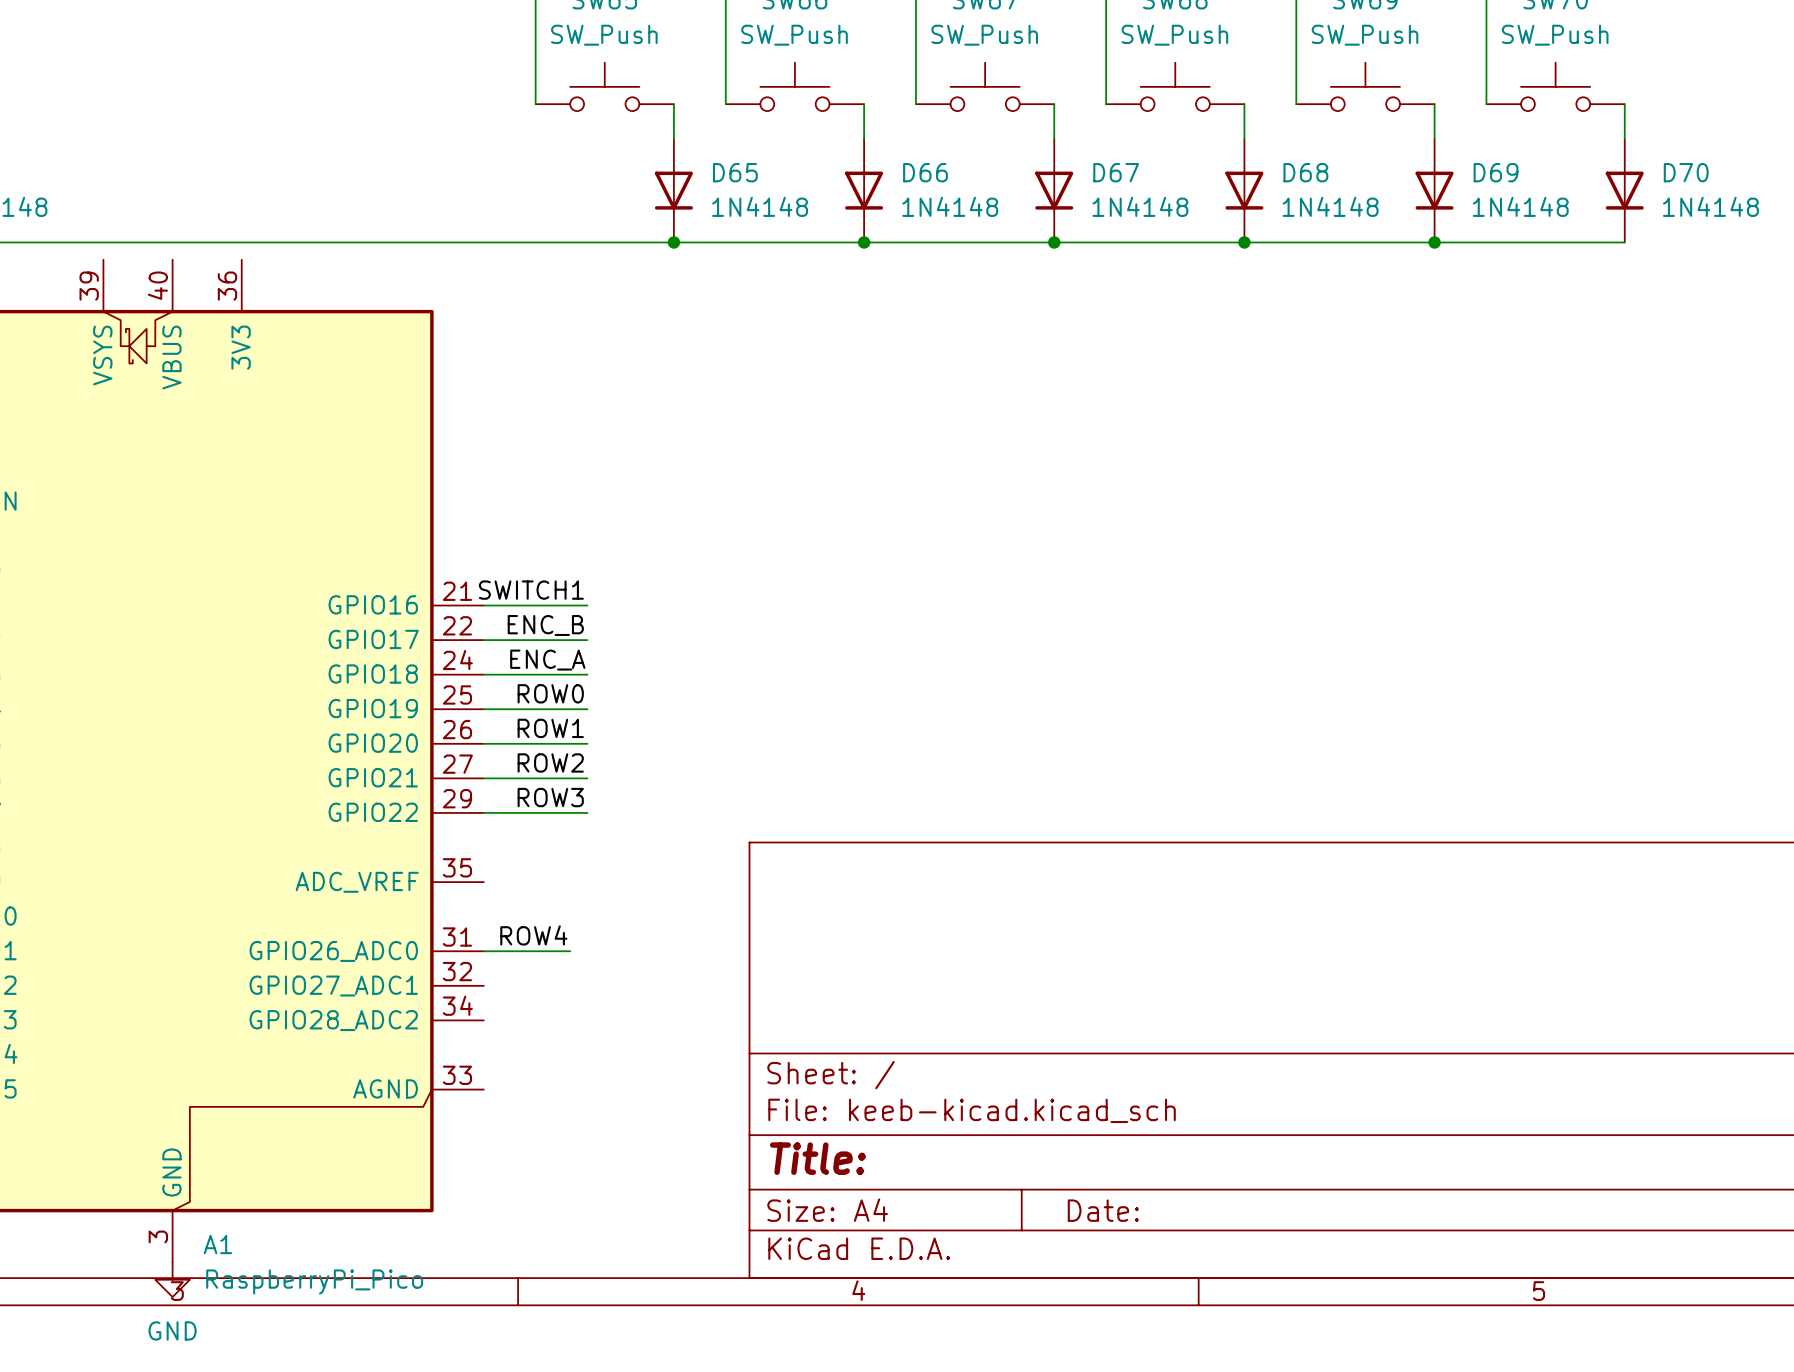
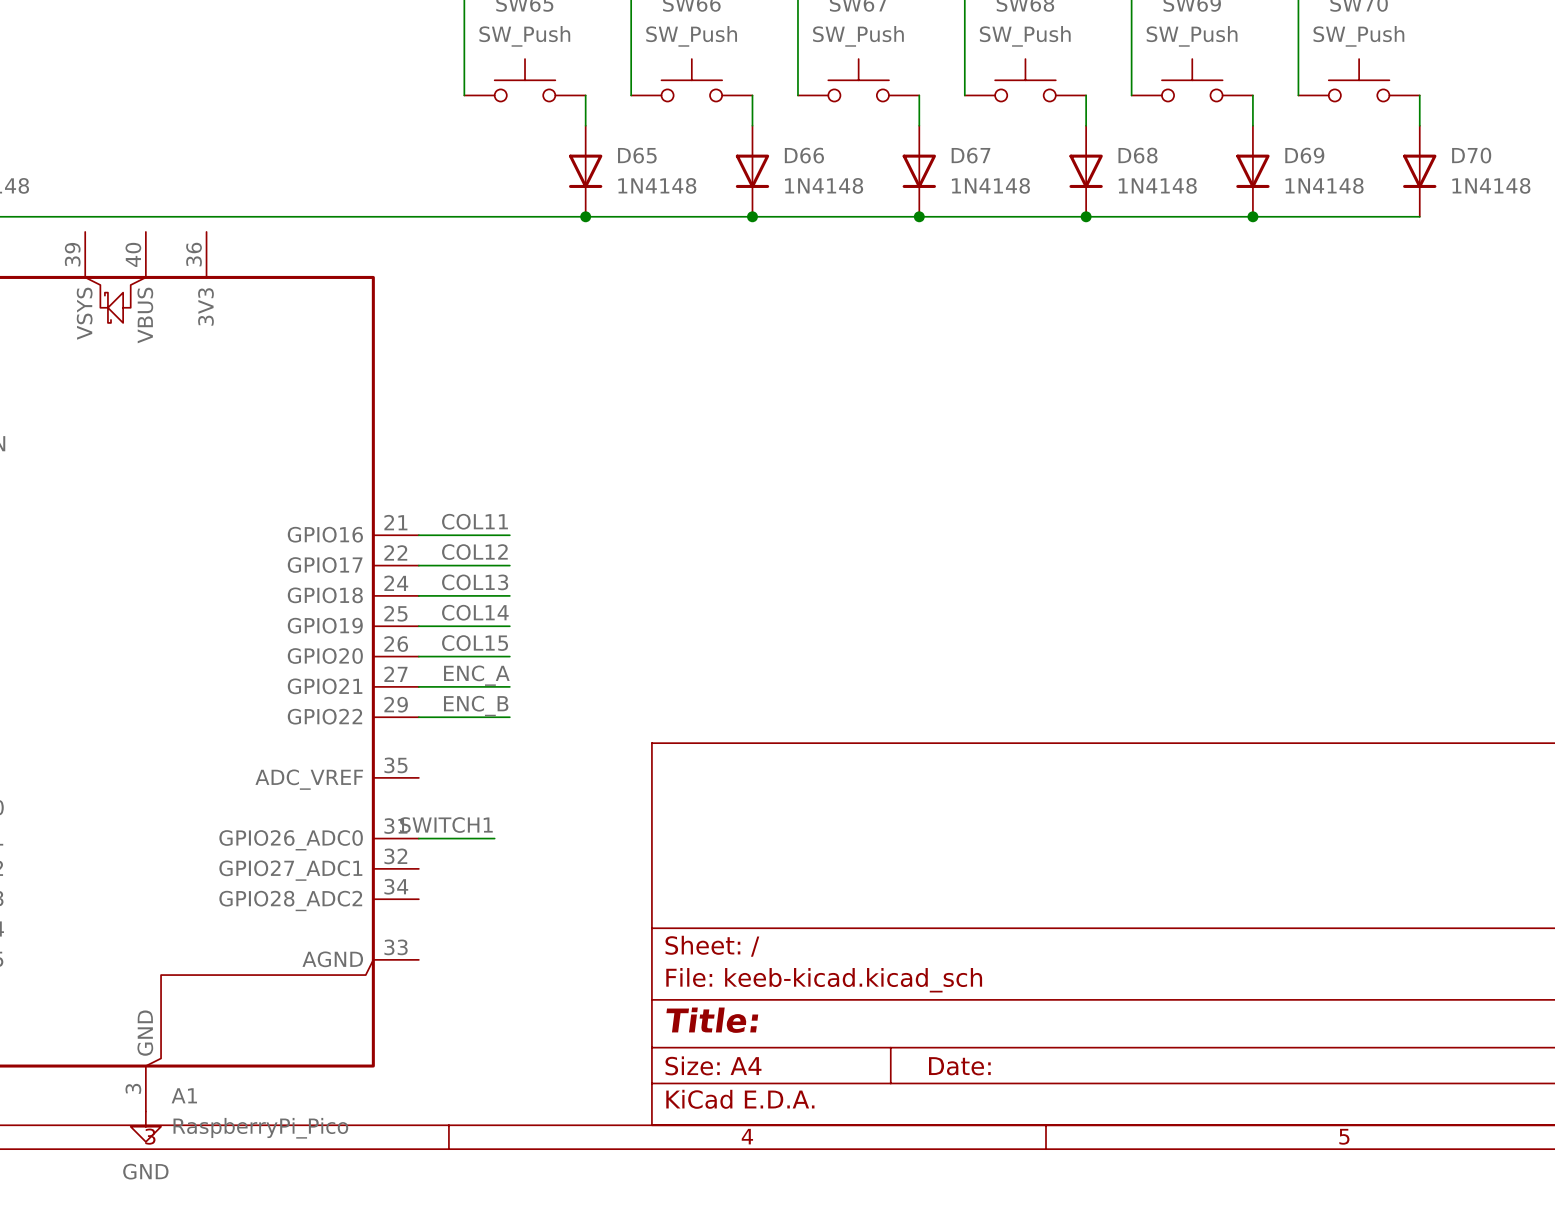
label: SWITCH1 (531, 590) -> COL11 (474, 521)
label: ENC_B (545, 625) -> COL12 (474, 552)
label: ENC_A (547, 660) -> COL13 (475, 582)
label: ROW0 (550, 693) -> COL14 (475, 612)
label: ROW1 (550, 728) -> COL15 (475, 643)
label: ROW2 (550, 762) -> ENC_A (476, 675)
label: ROW3 (550, 797) -> ENC_B (476, 706)
label: ROW4 (533, 935) -> SWITCH1 (446, 825)

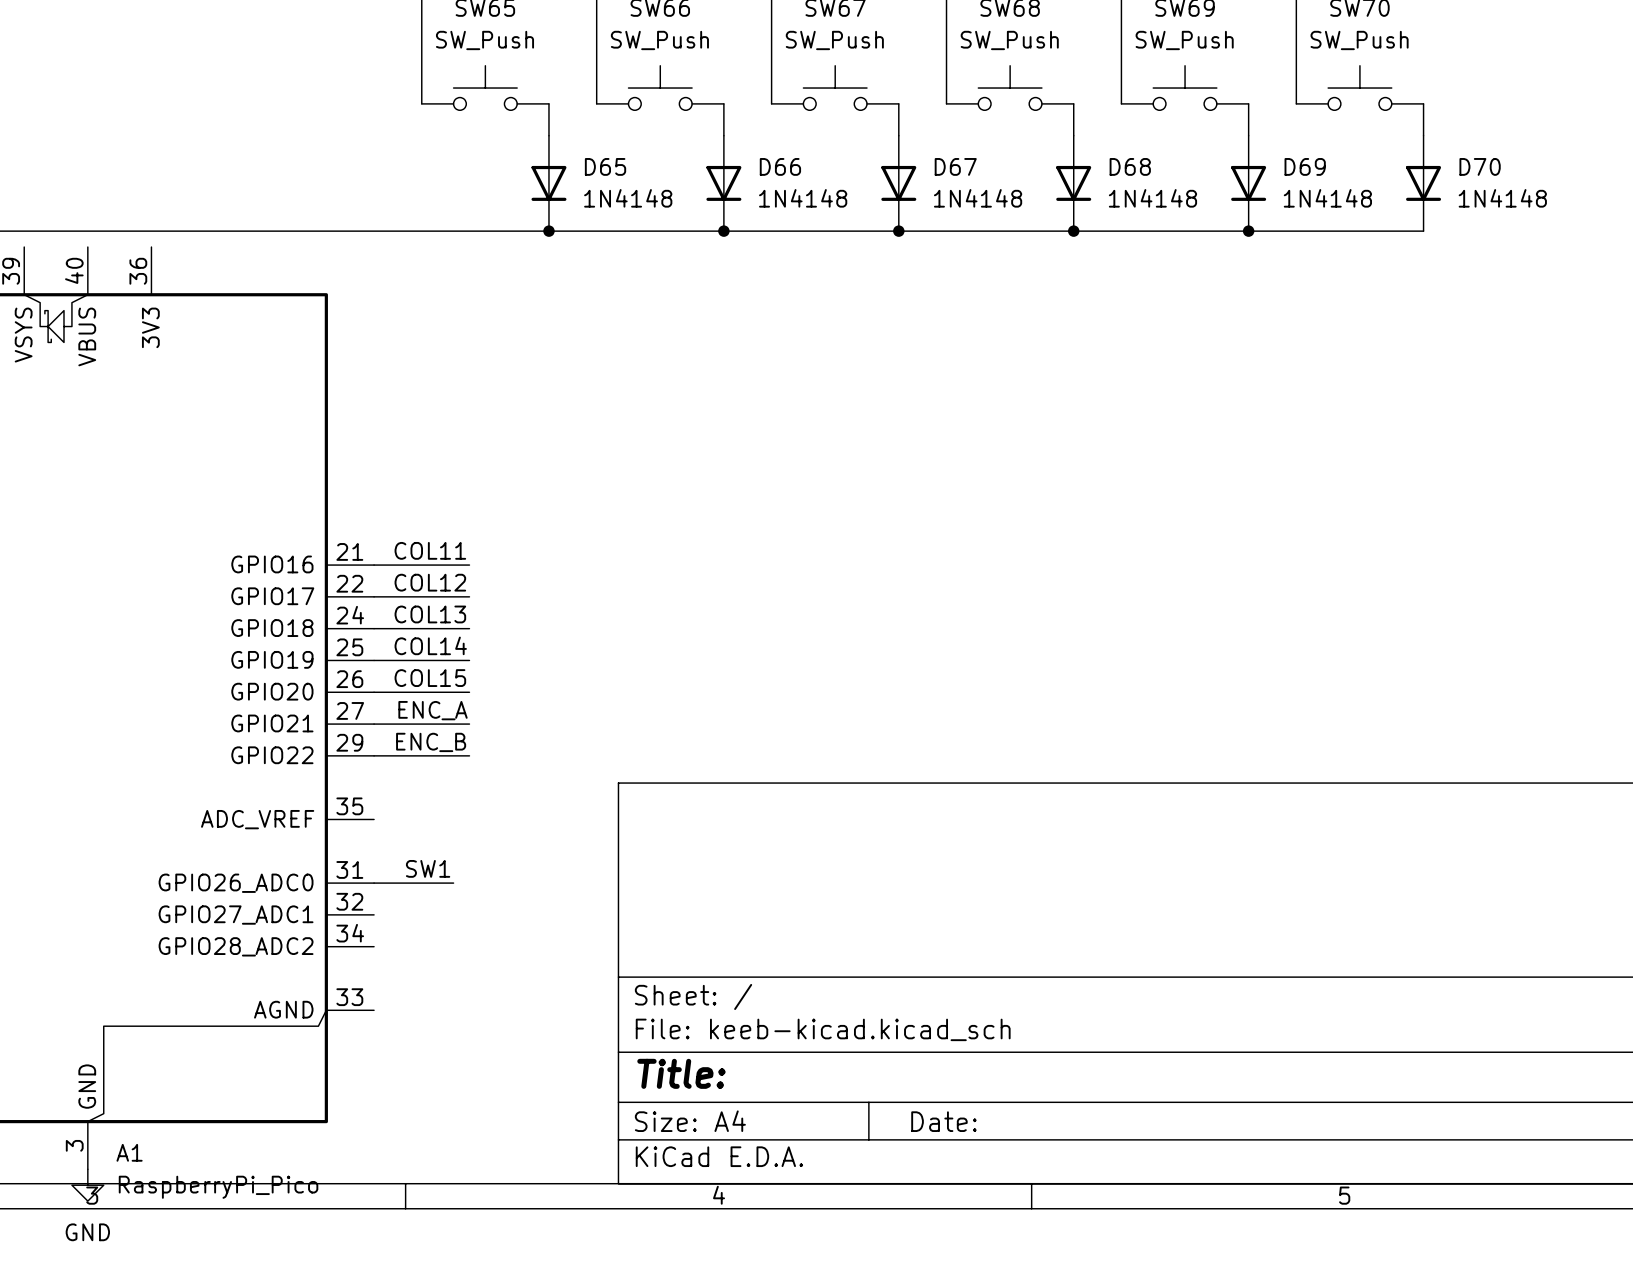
label: SWITCH1 (446, 825) -> SW1 (428, 868)

